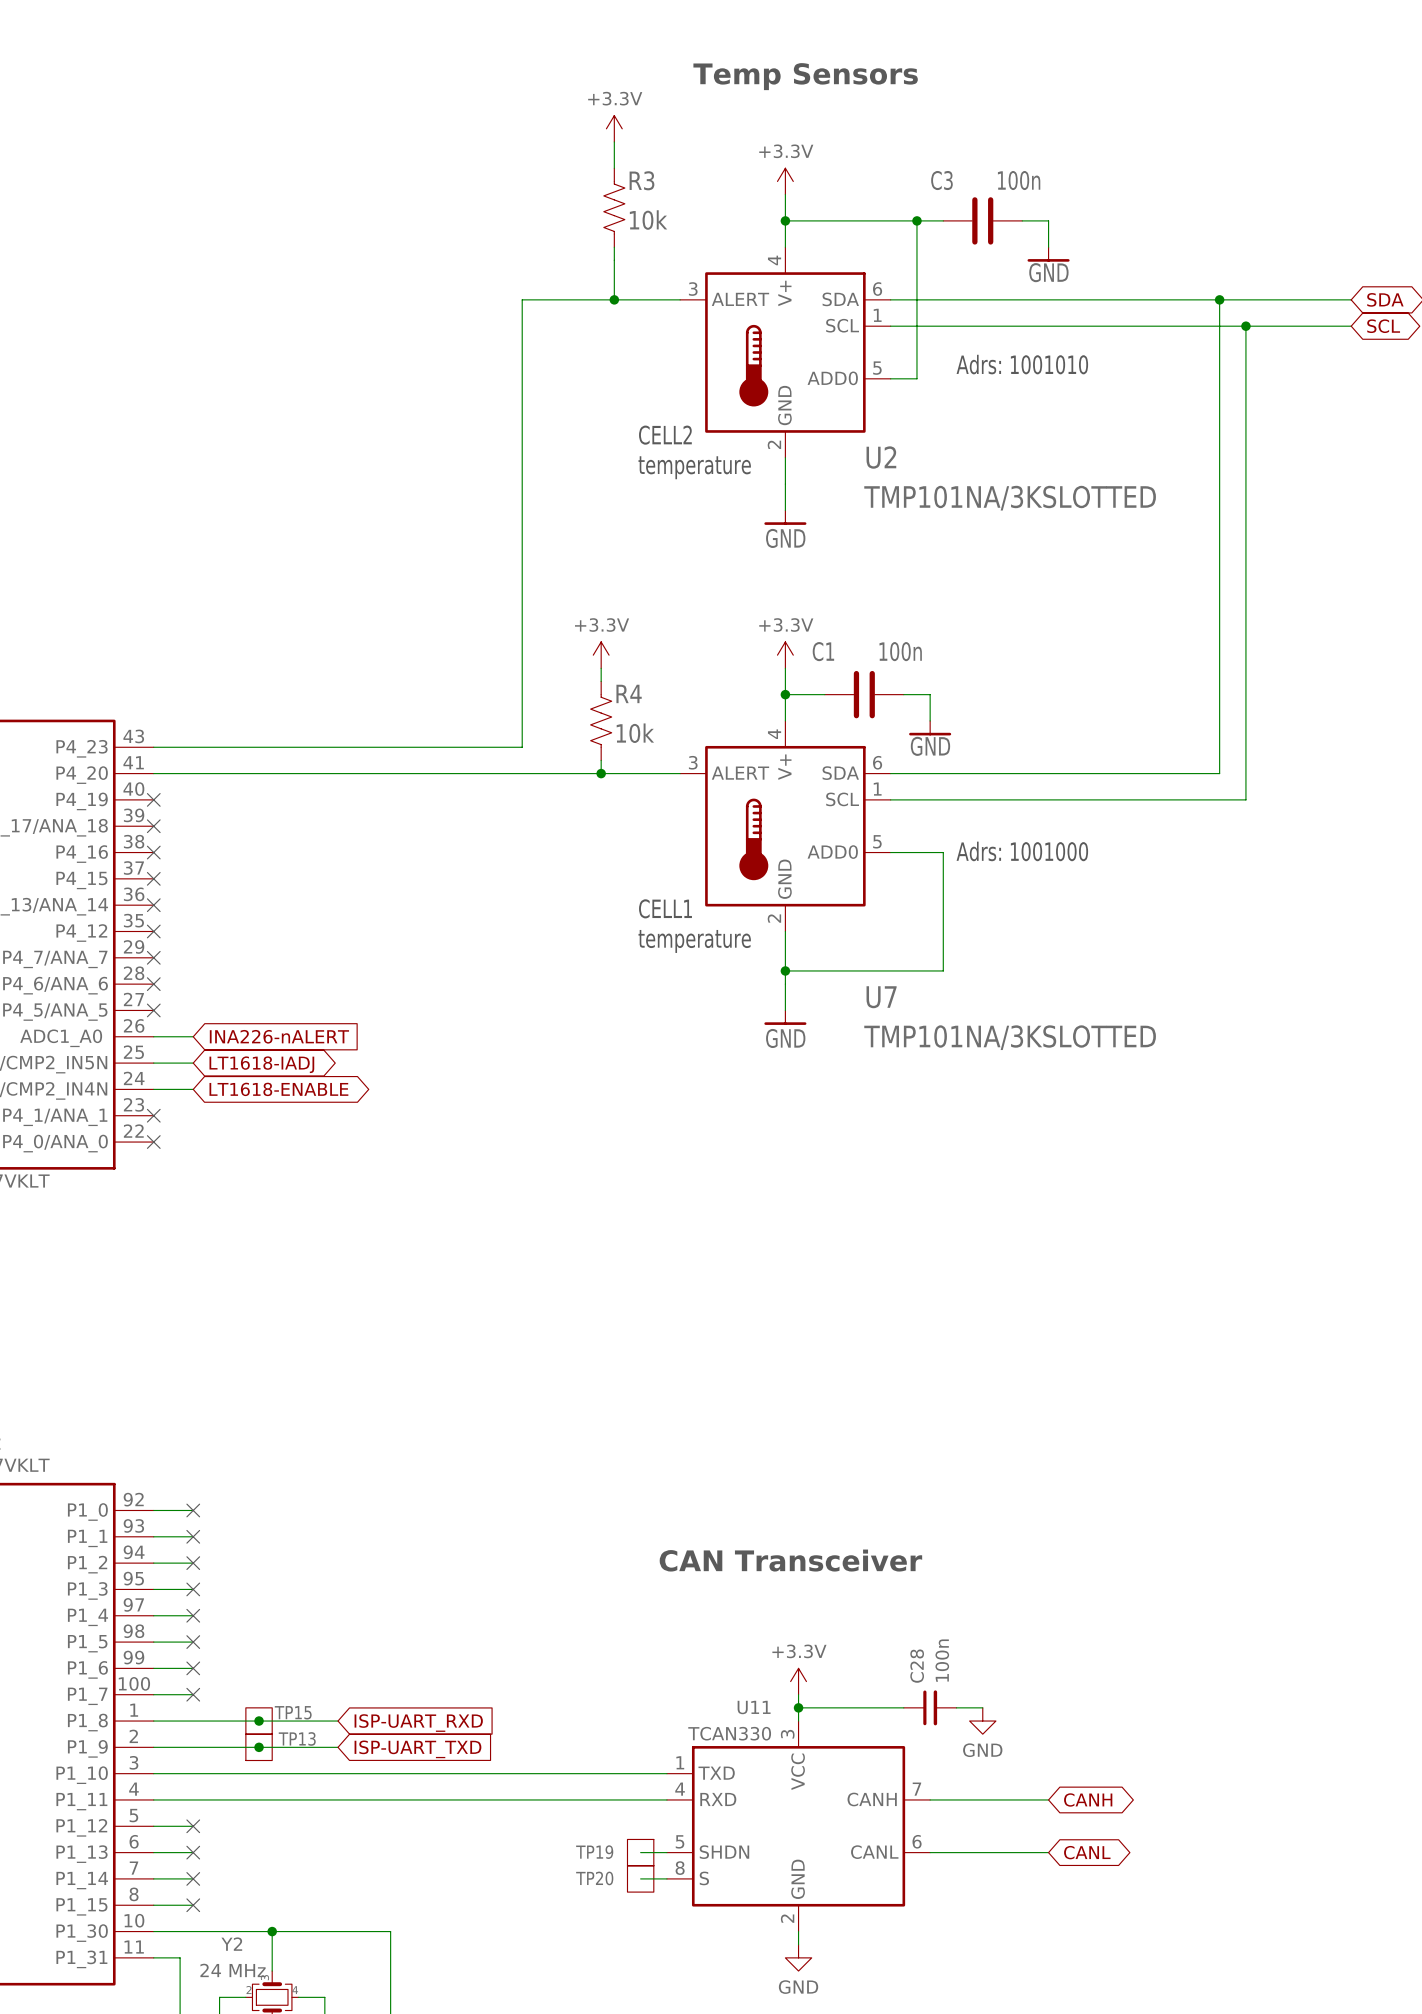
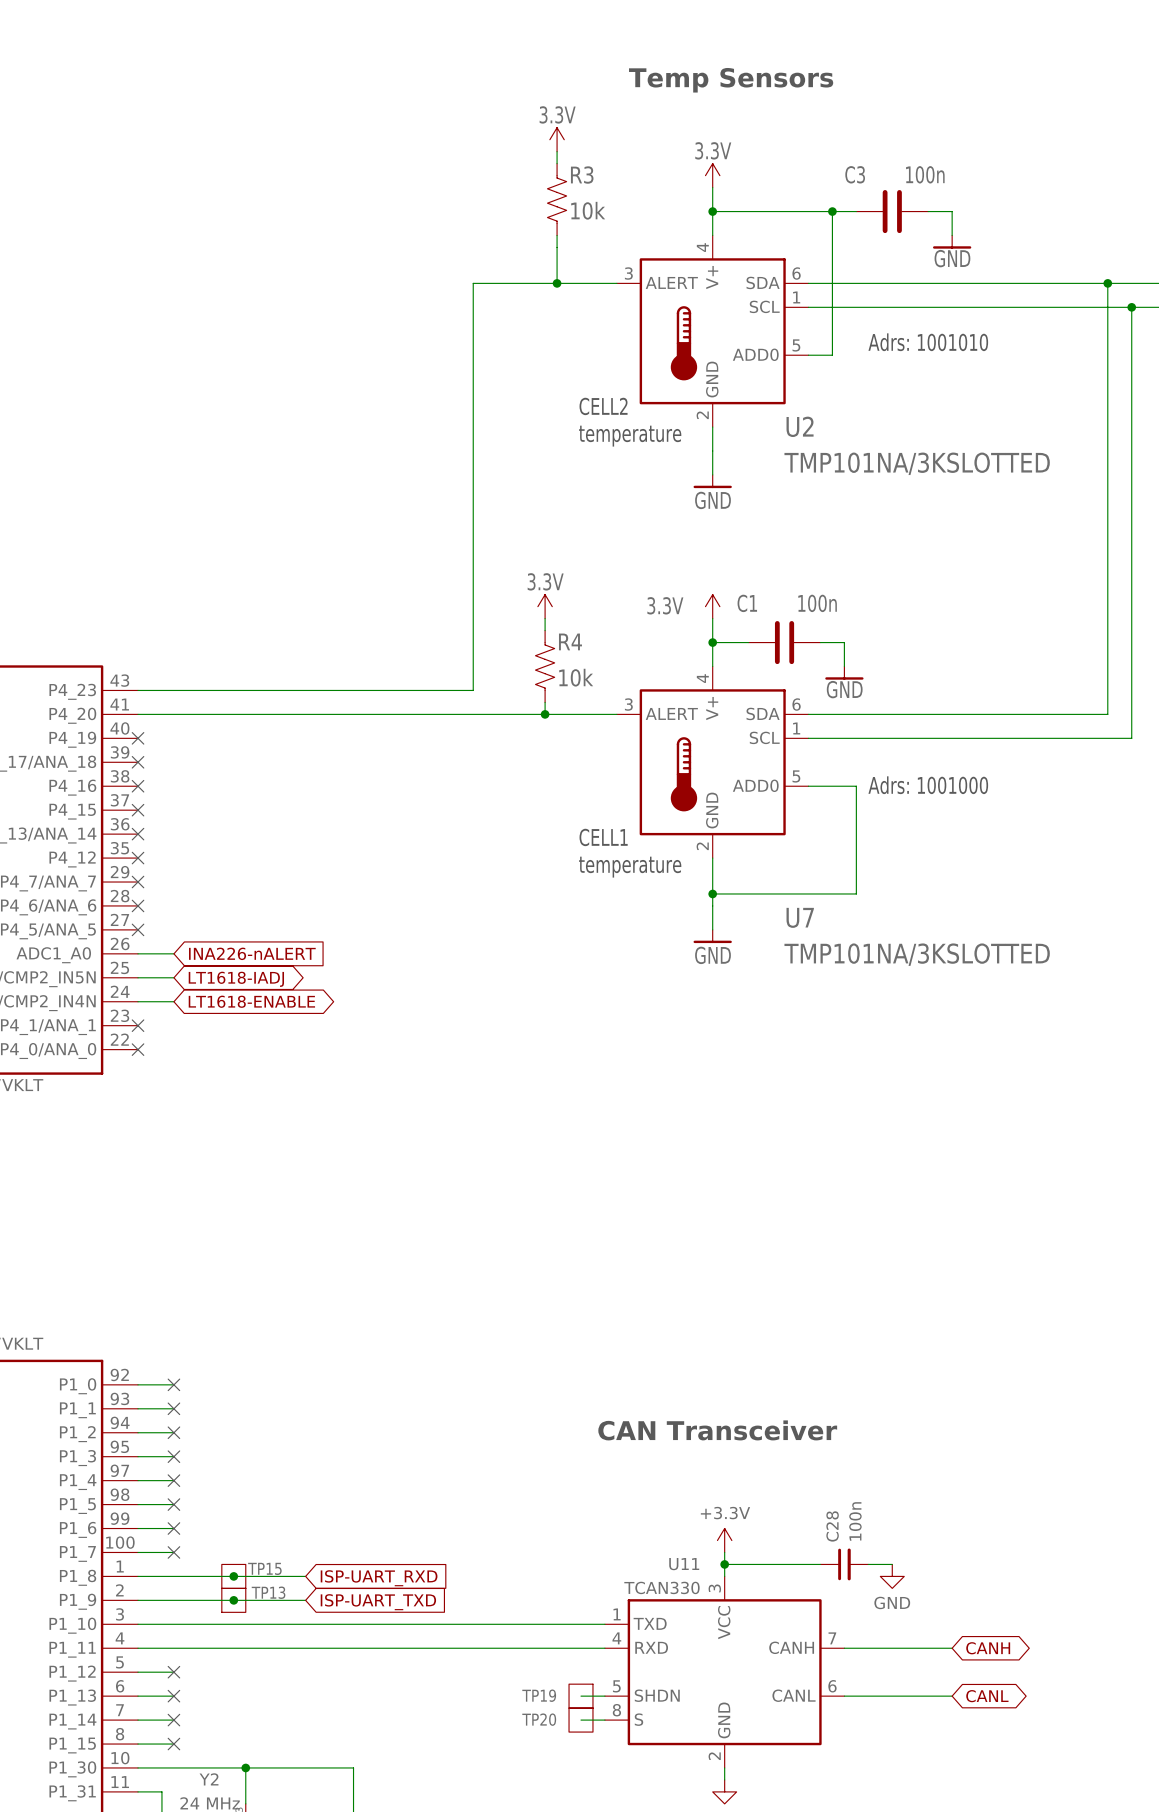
power symbol: +3.3V (614, 128) -> none
power symbol: none -> 3.3V (557, 139)
power symbol: +3.3V (785, 181) -> 3.3V (712, 175)
power symbol: +3.3V (601, 655) -> 3.3V (545, 606)
power symbol: +3.3V (785, 655) -> 3.3V (712, 606)

